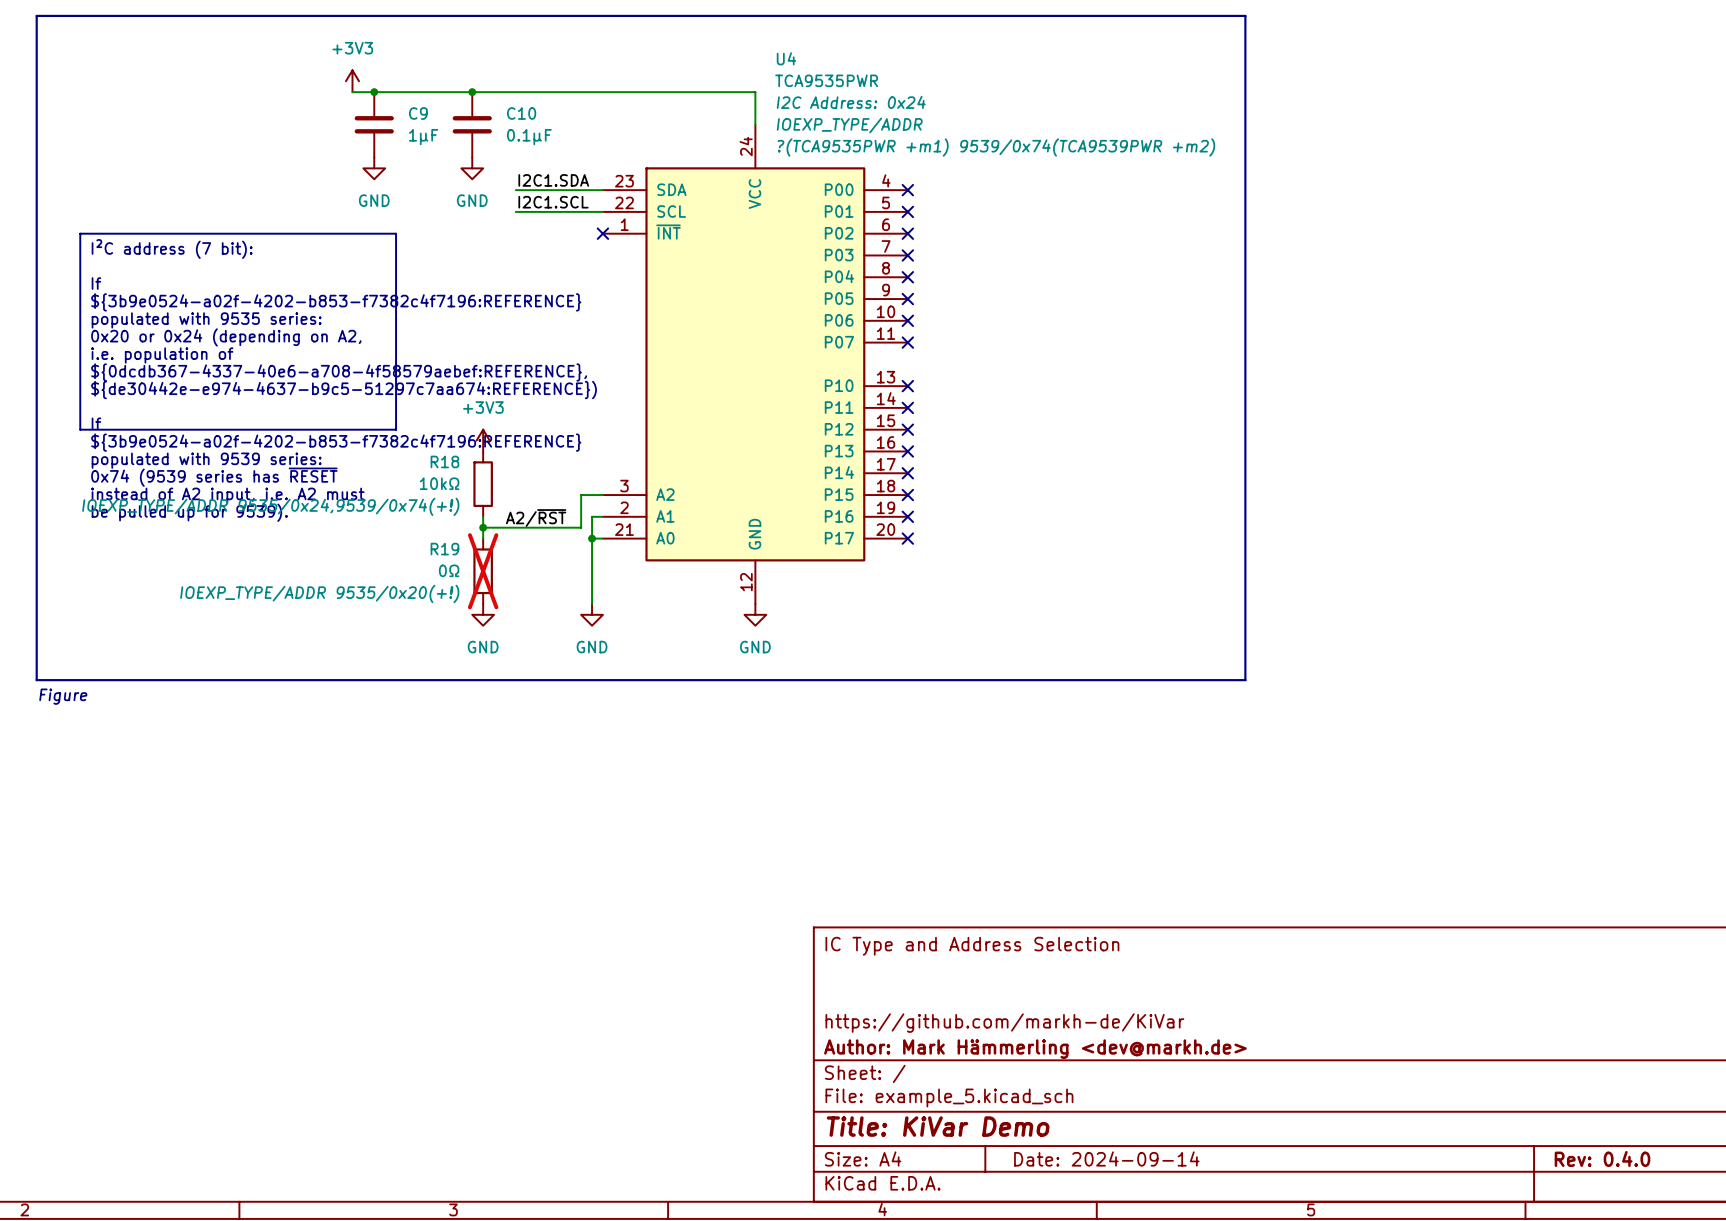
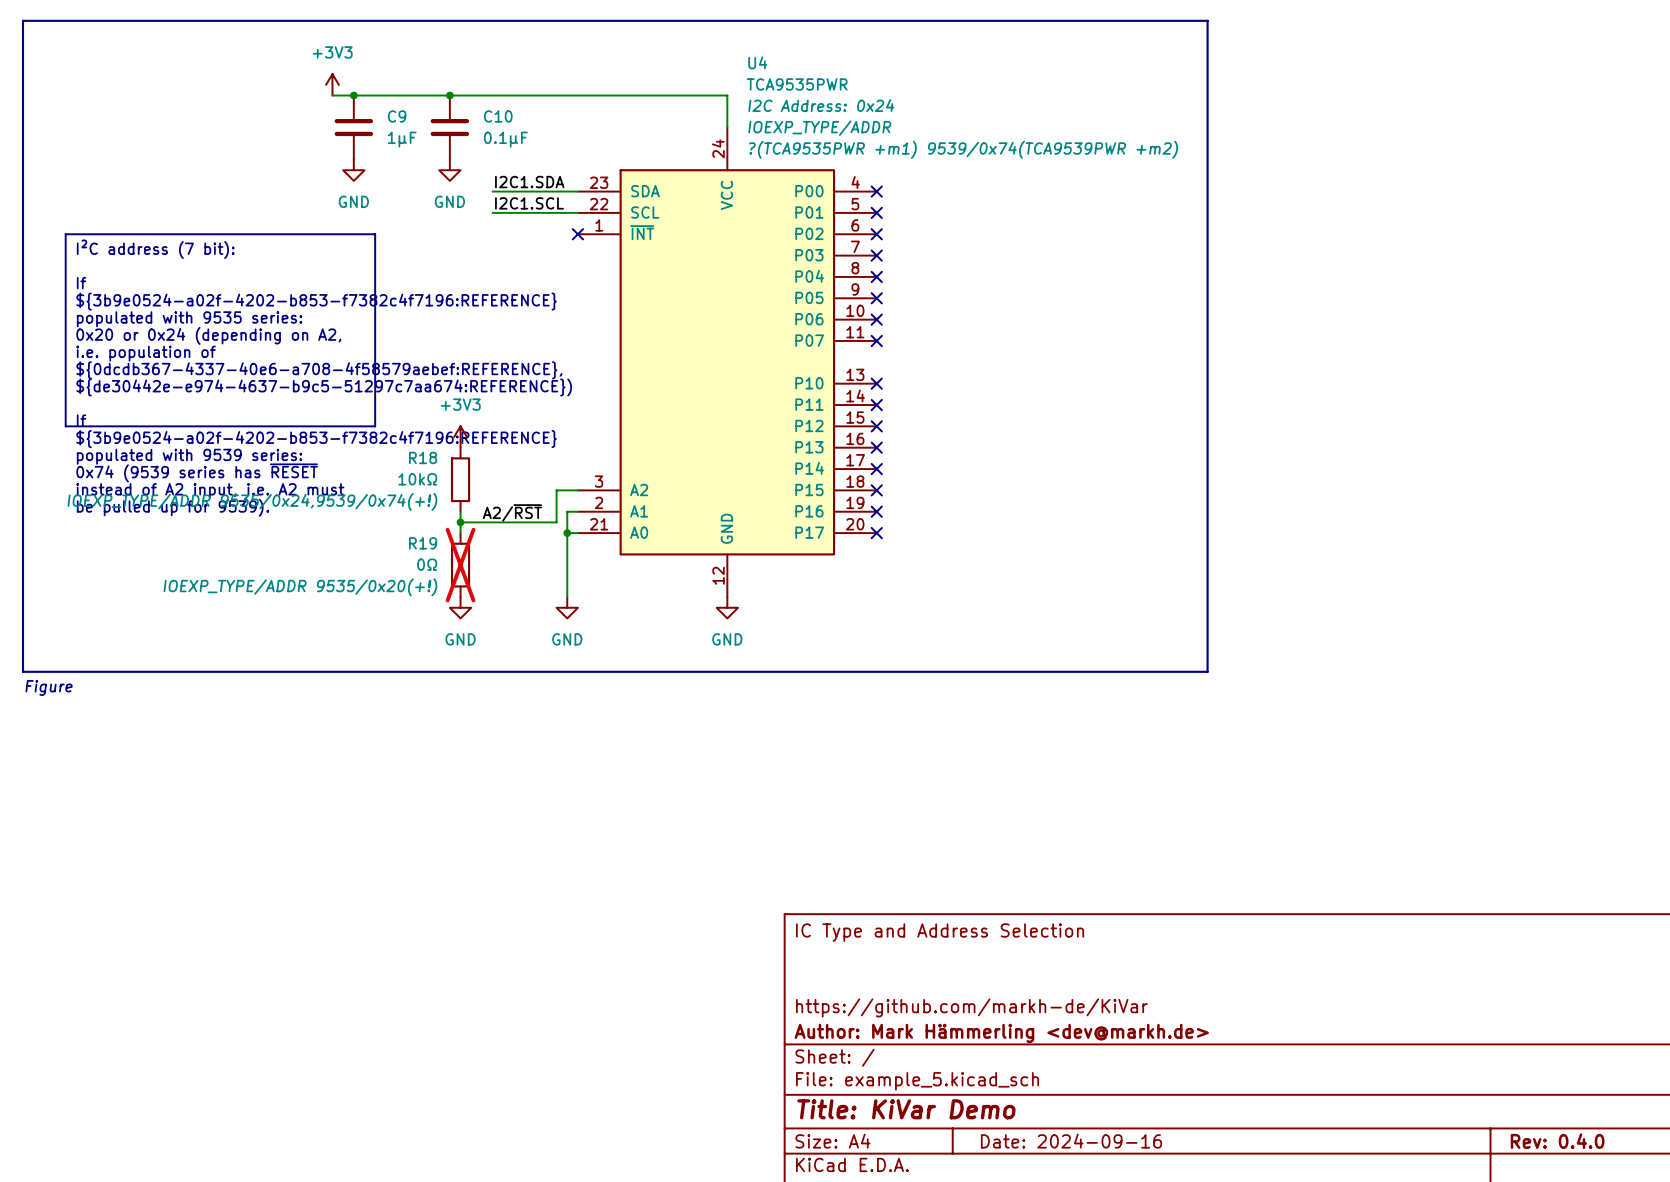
title block: Date: 2024-09-14 (1106, 1158) -> Date: 2024-09-16 (1071, 1141)

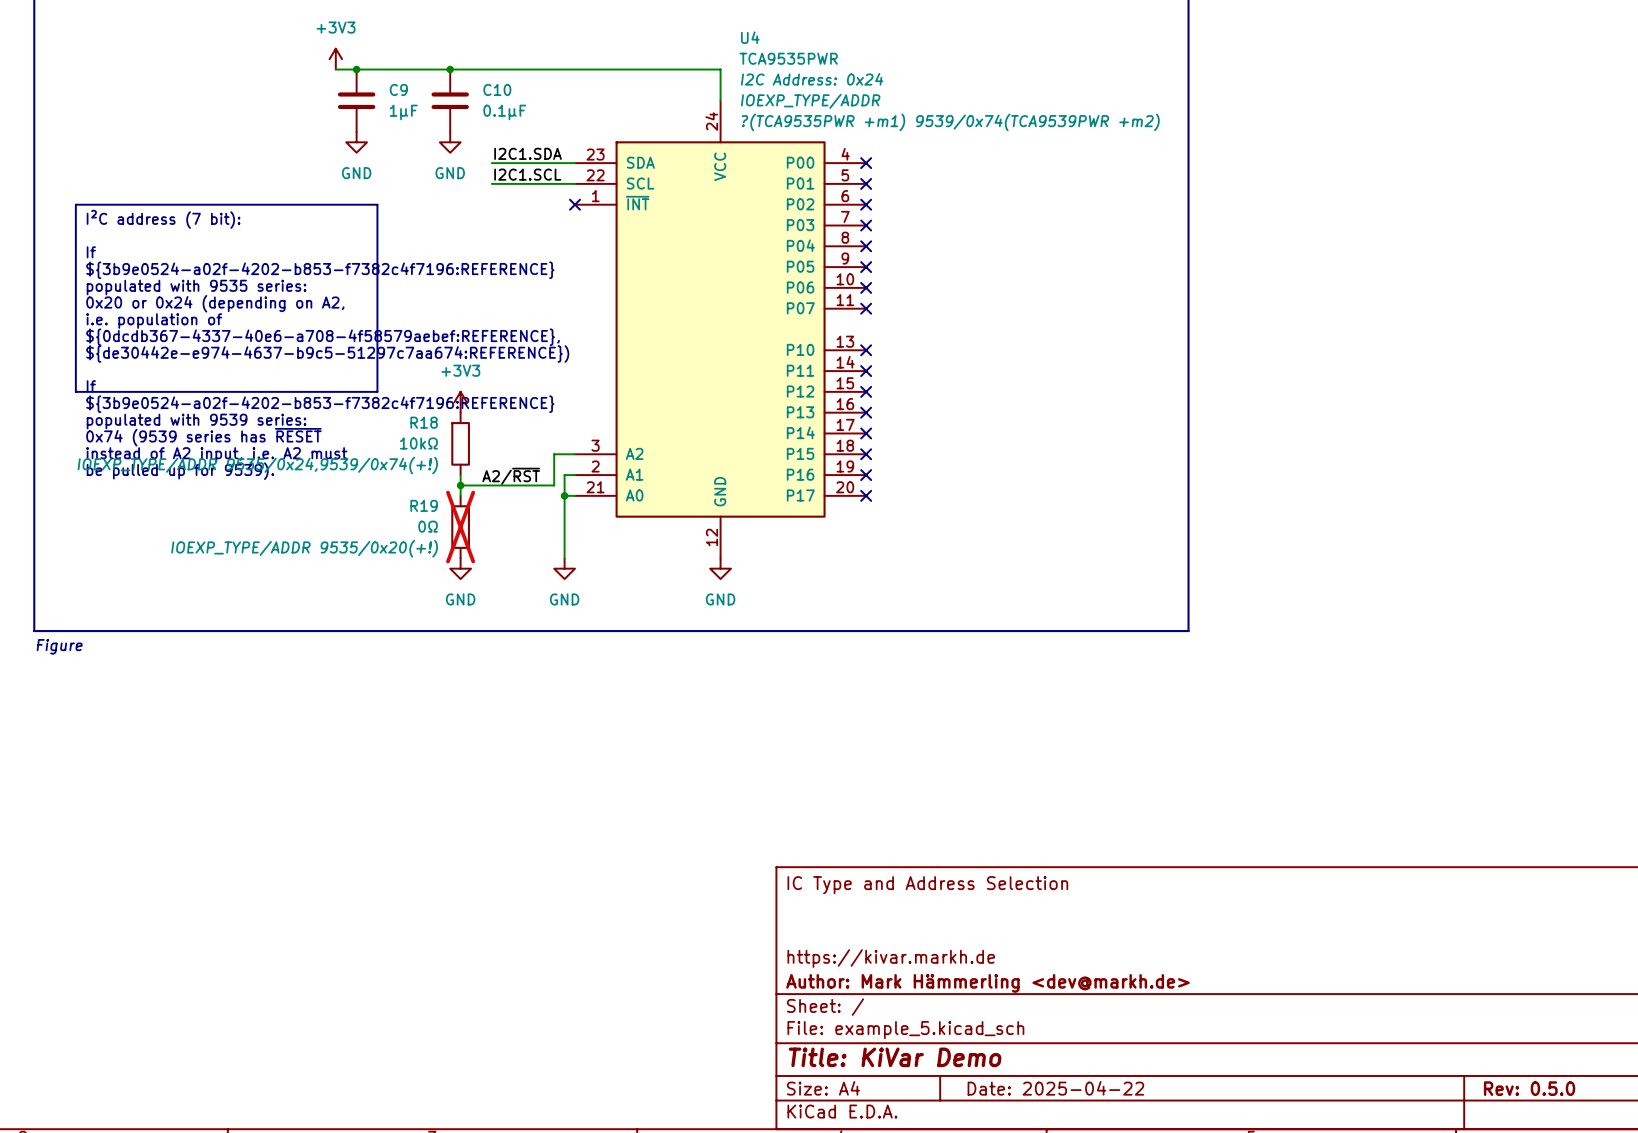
title block: https://github.com/markh-de/KiVar (971, 1007) -> https://kivar.markh.de (891, 958)
title block: Date: 2024-09-16 (1071, 1141) -> Date: 2025-04-22 (1055, 1088)
title block: Rev: 0.4.0 (1557, 1141) -> Rev: 0.5.0 (1529, 1088)

